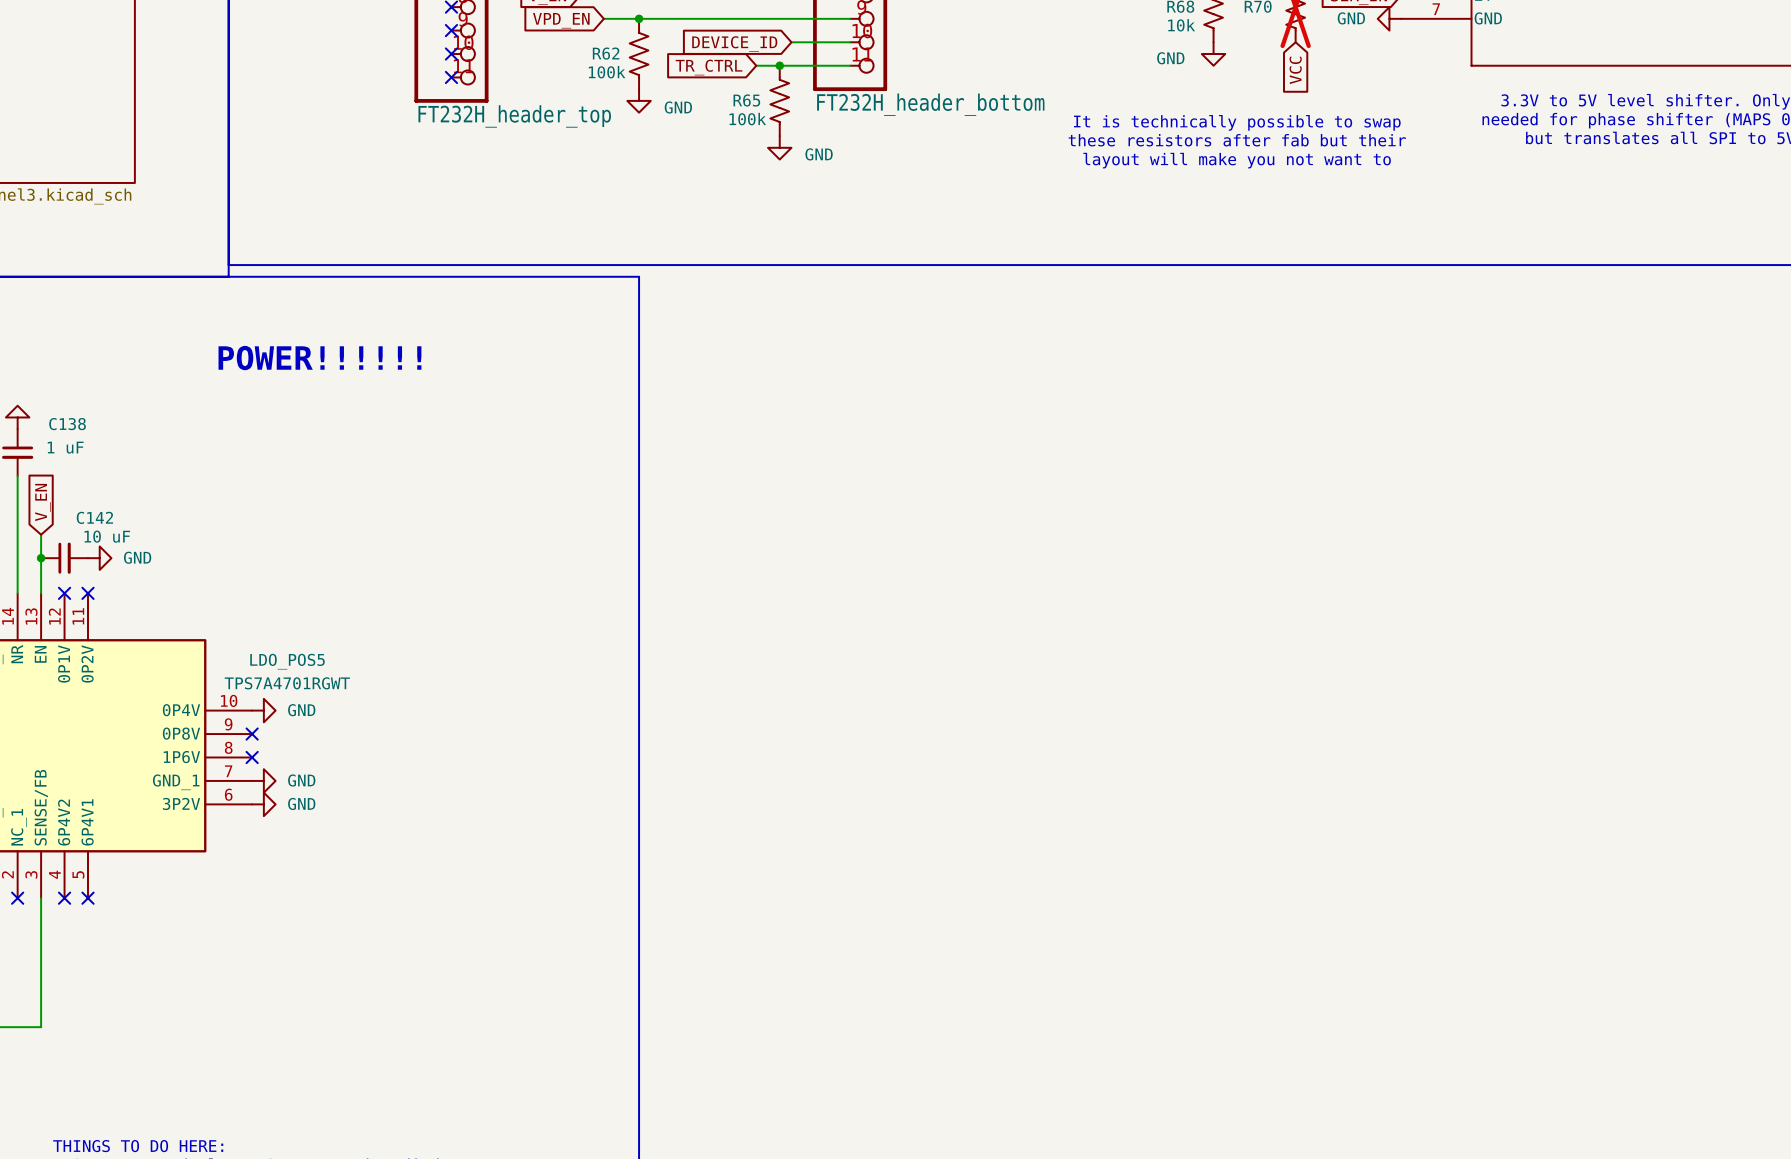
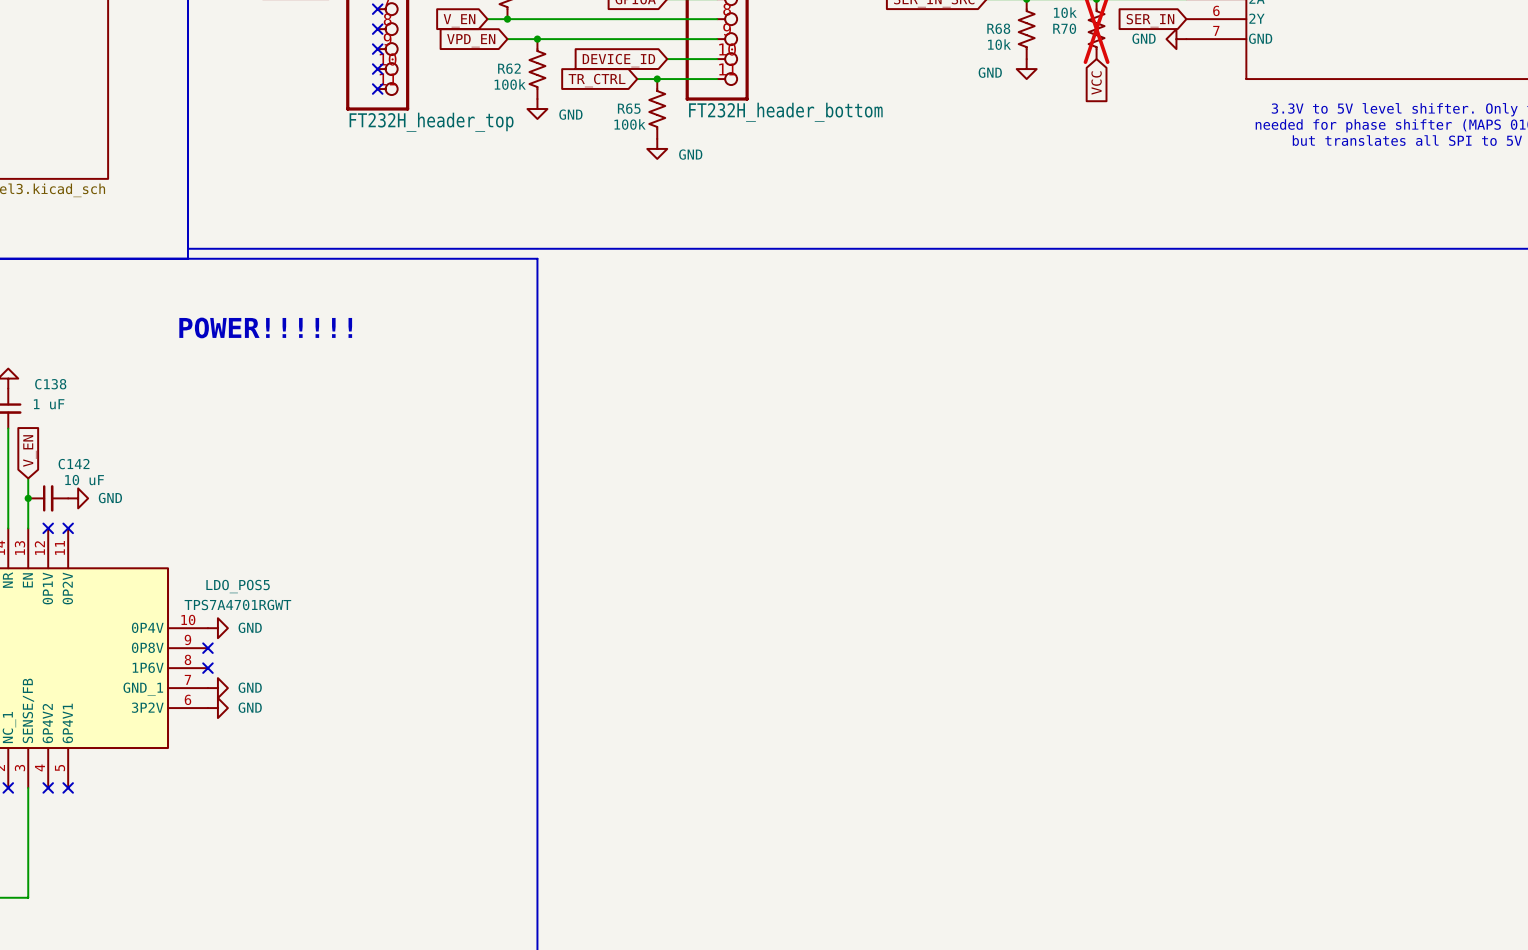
text: It is technically possible to swap (1237, 122) -> none
text: these resistors after fab but their (1237, 140) -> none
text: layout will make you not want to (1237, 160) -> none

